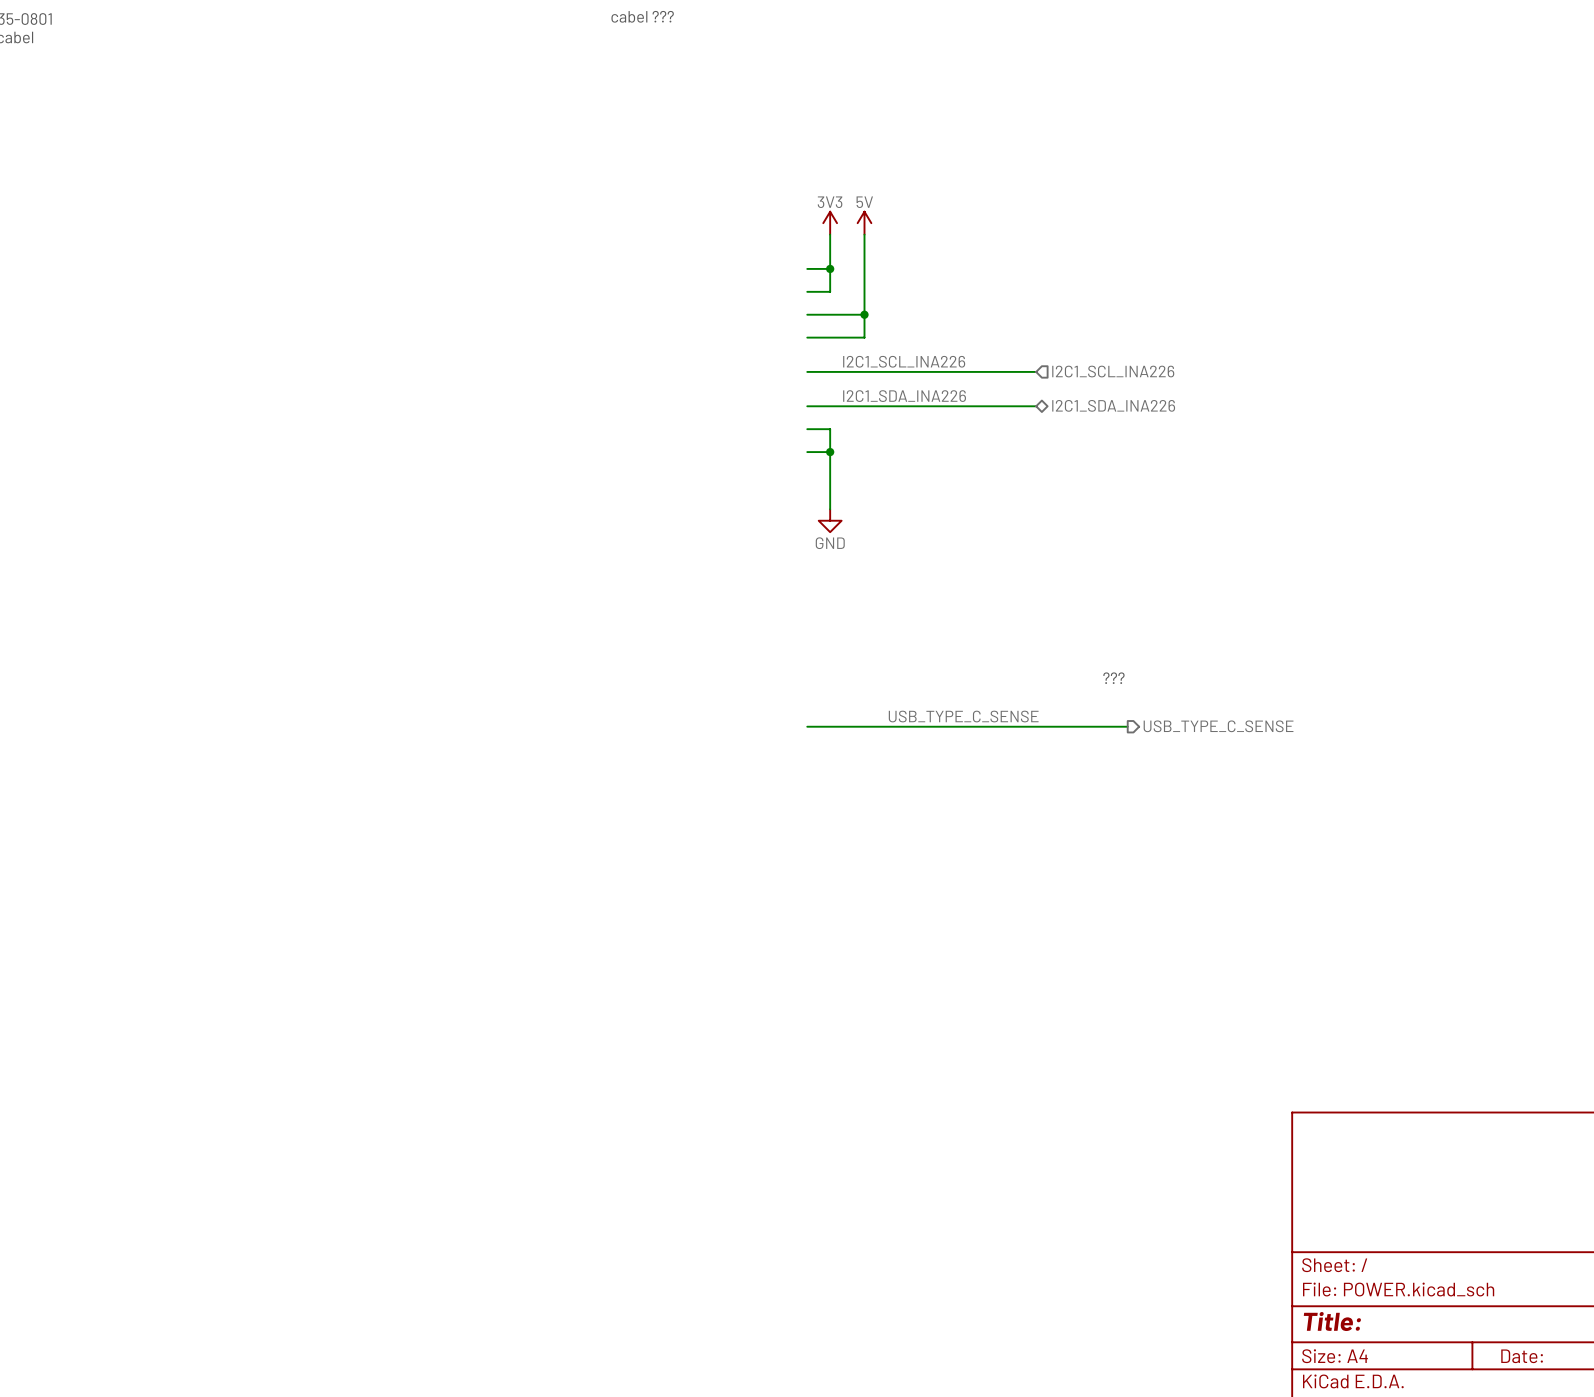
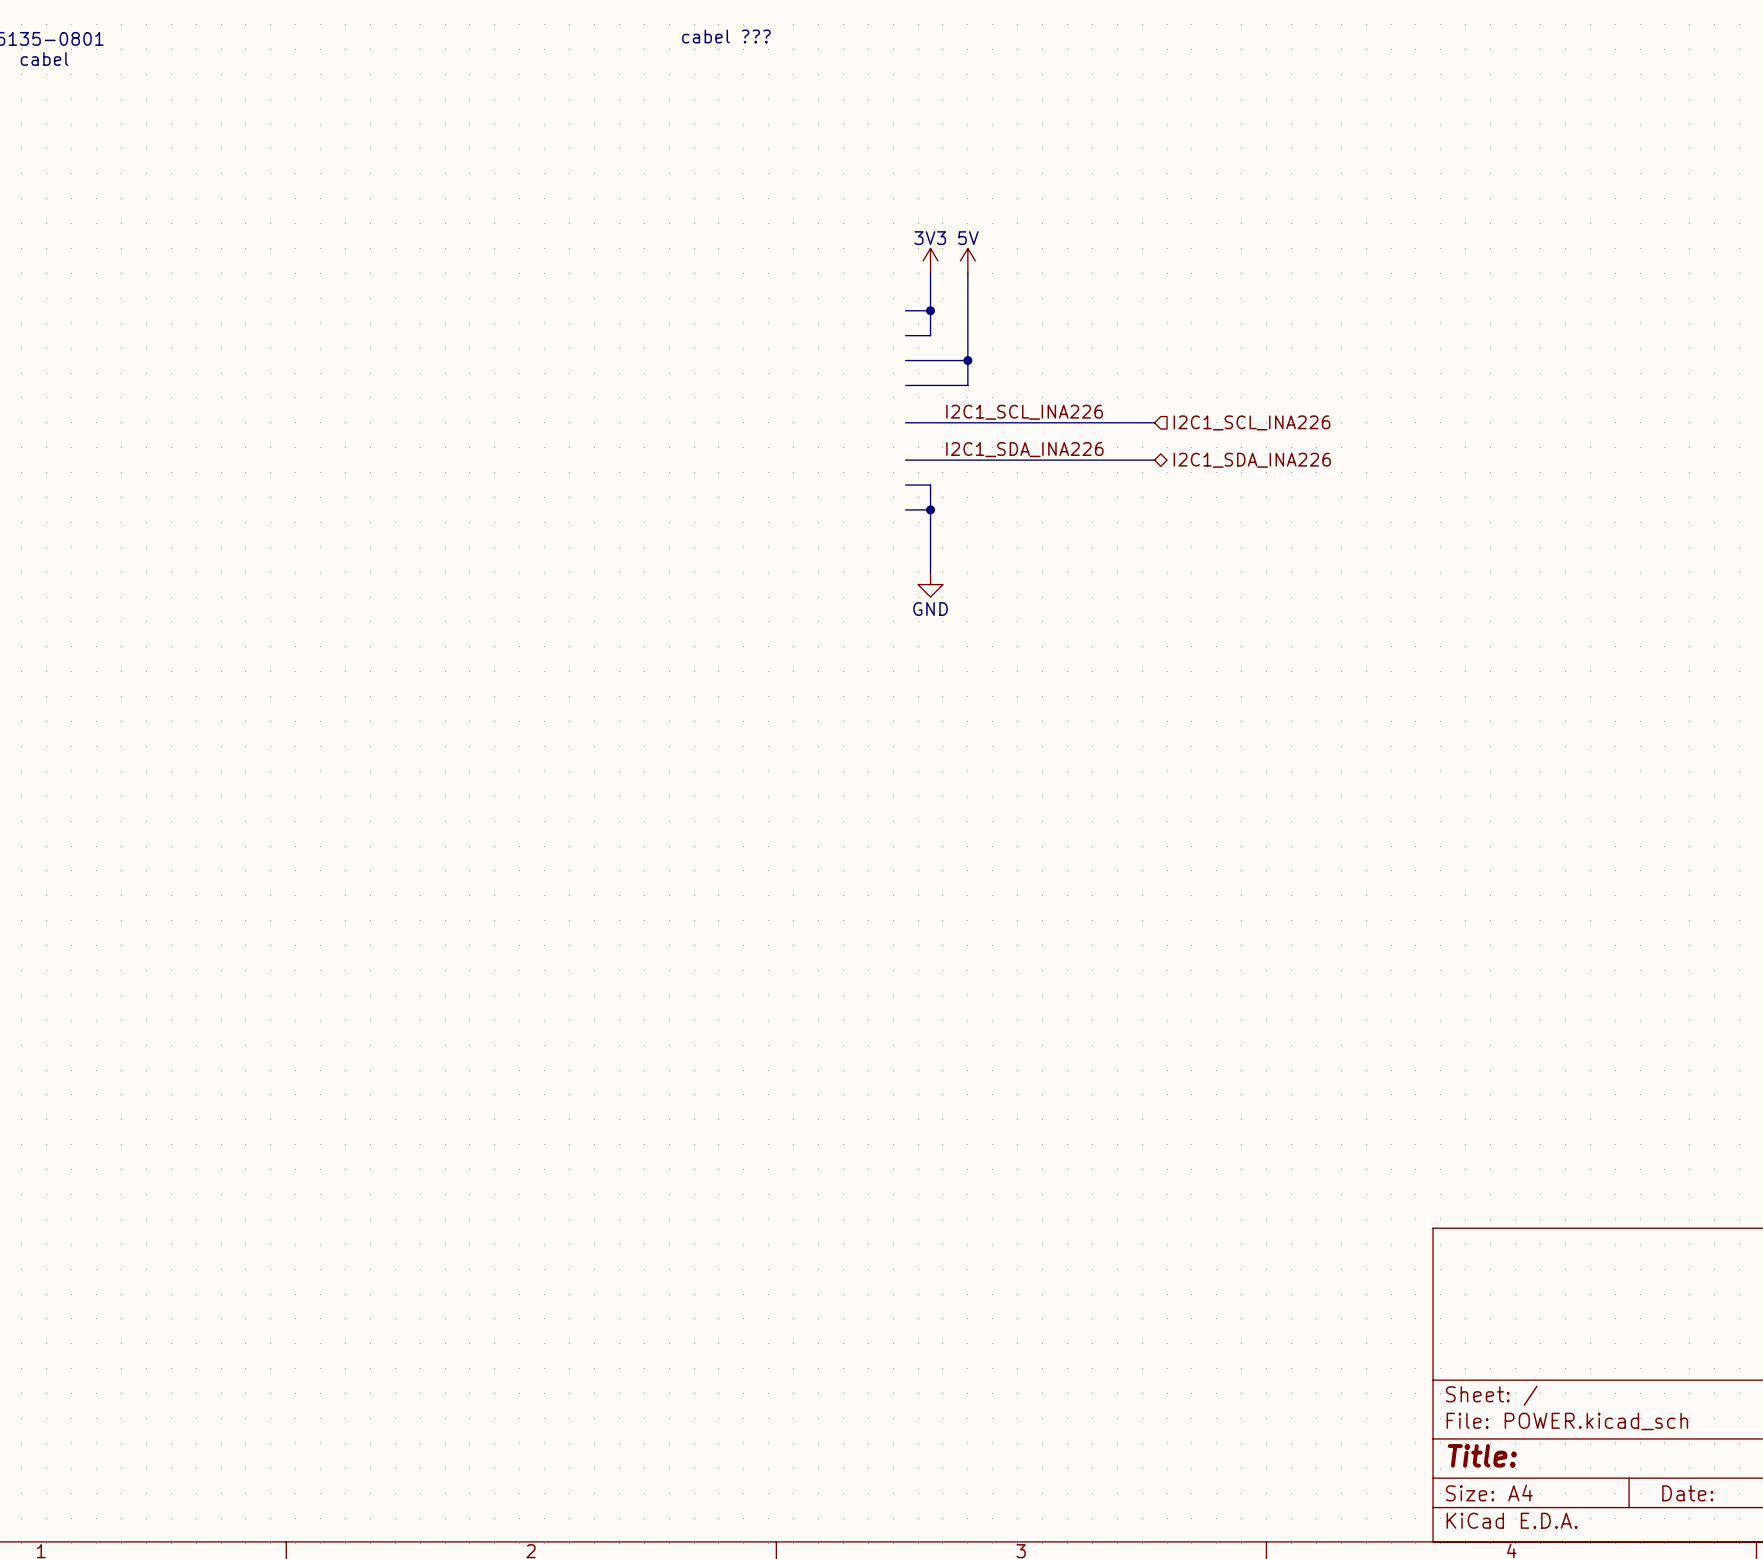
text: ??? (1113, 678) -> none
label: USB_TYPE_C_SENSE (963, 716) -> none
wire: (807, 726) (1127, 726) -> none
hierarchical label: USB_TYPE_C_SENSE (1218, 726) -> none

